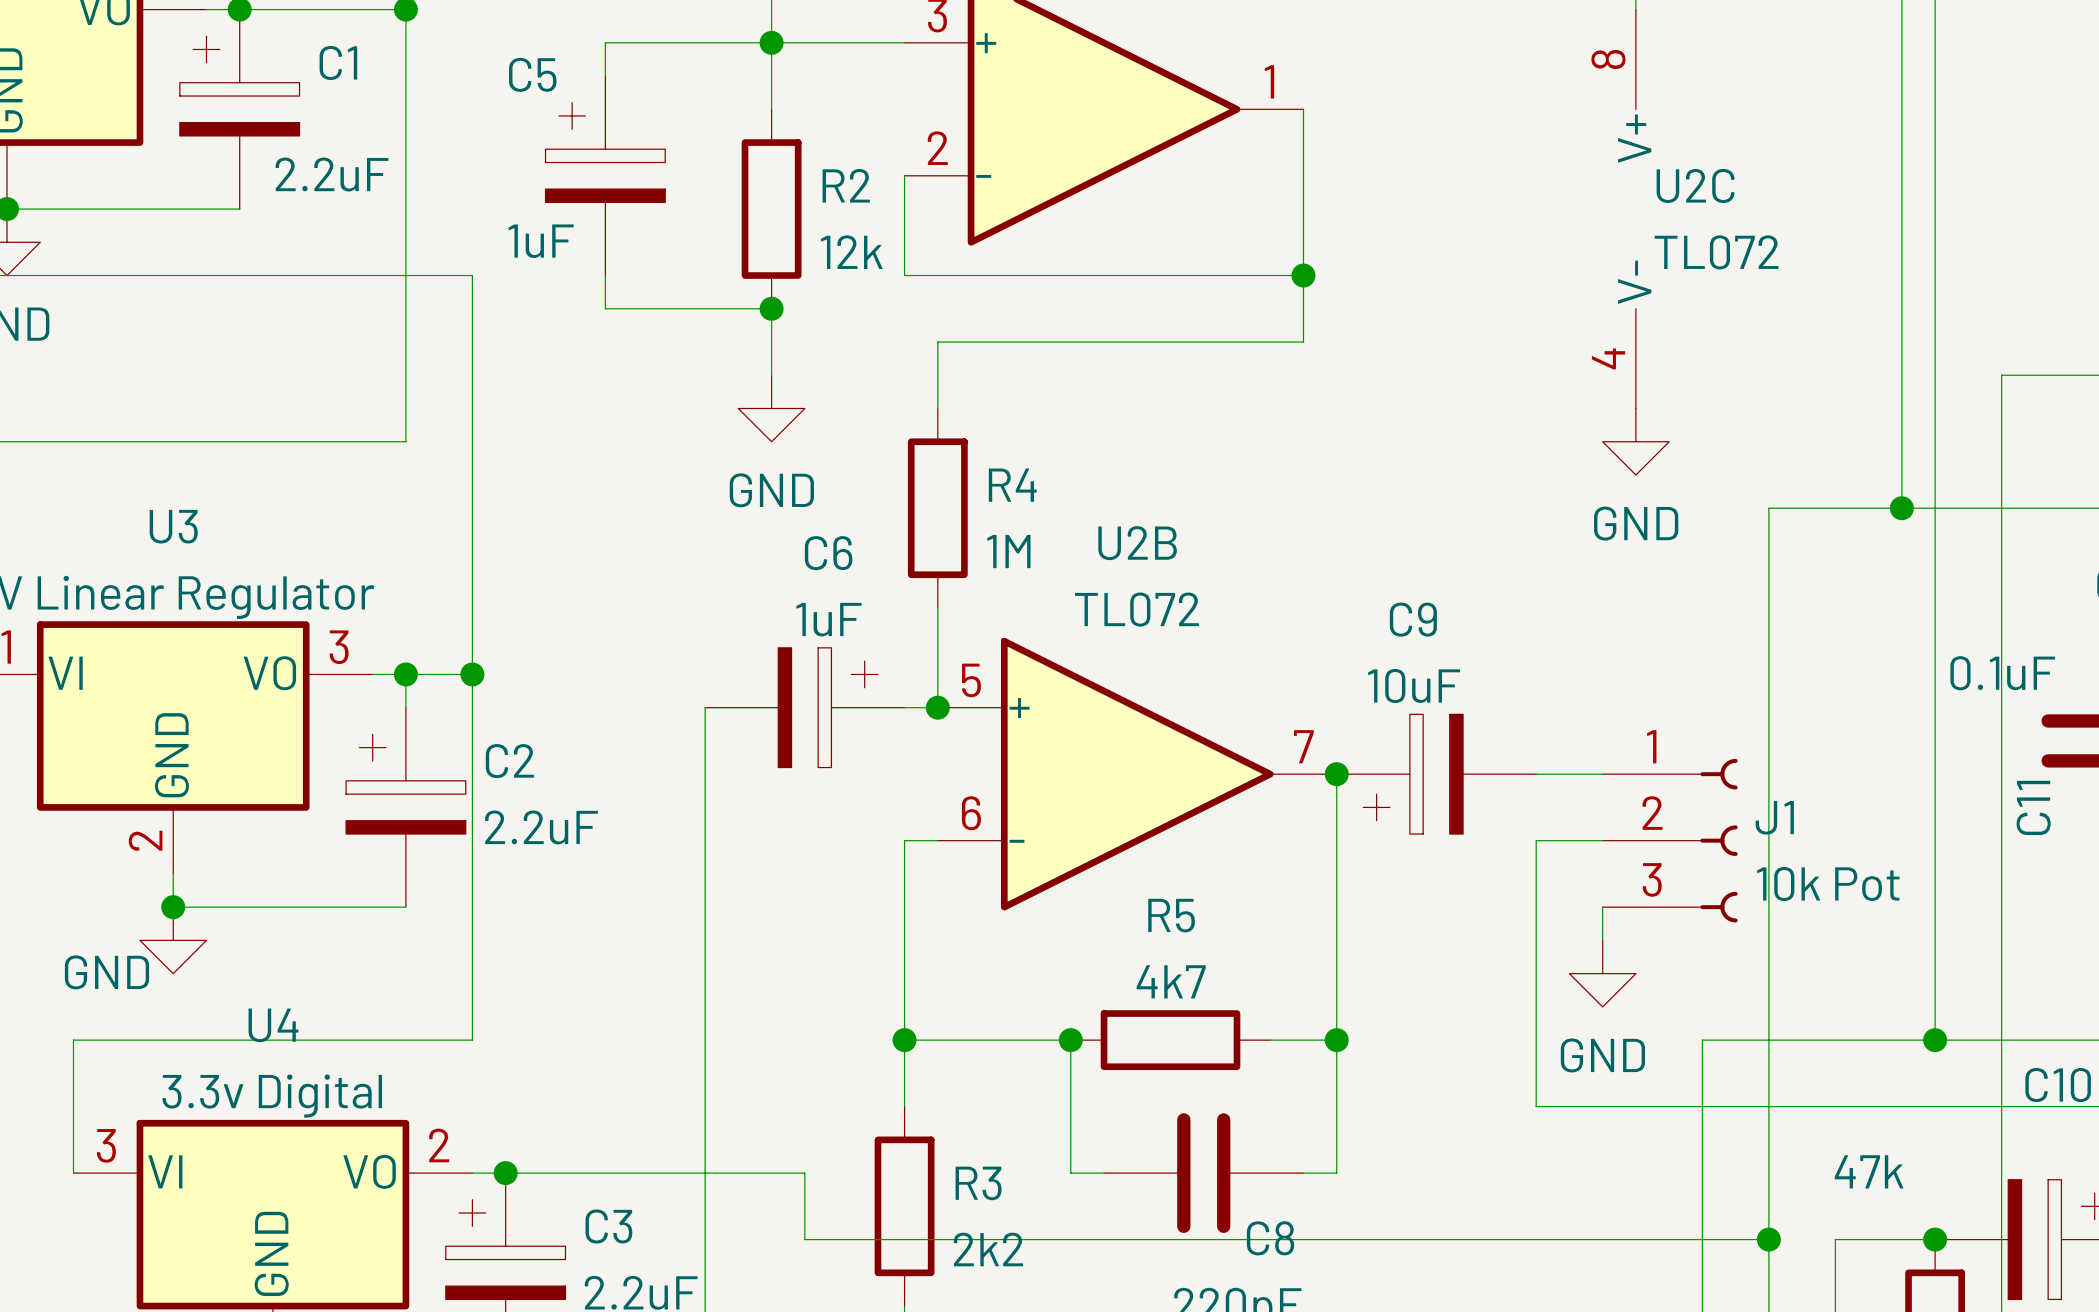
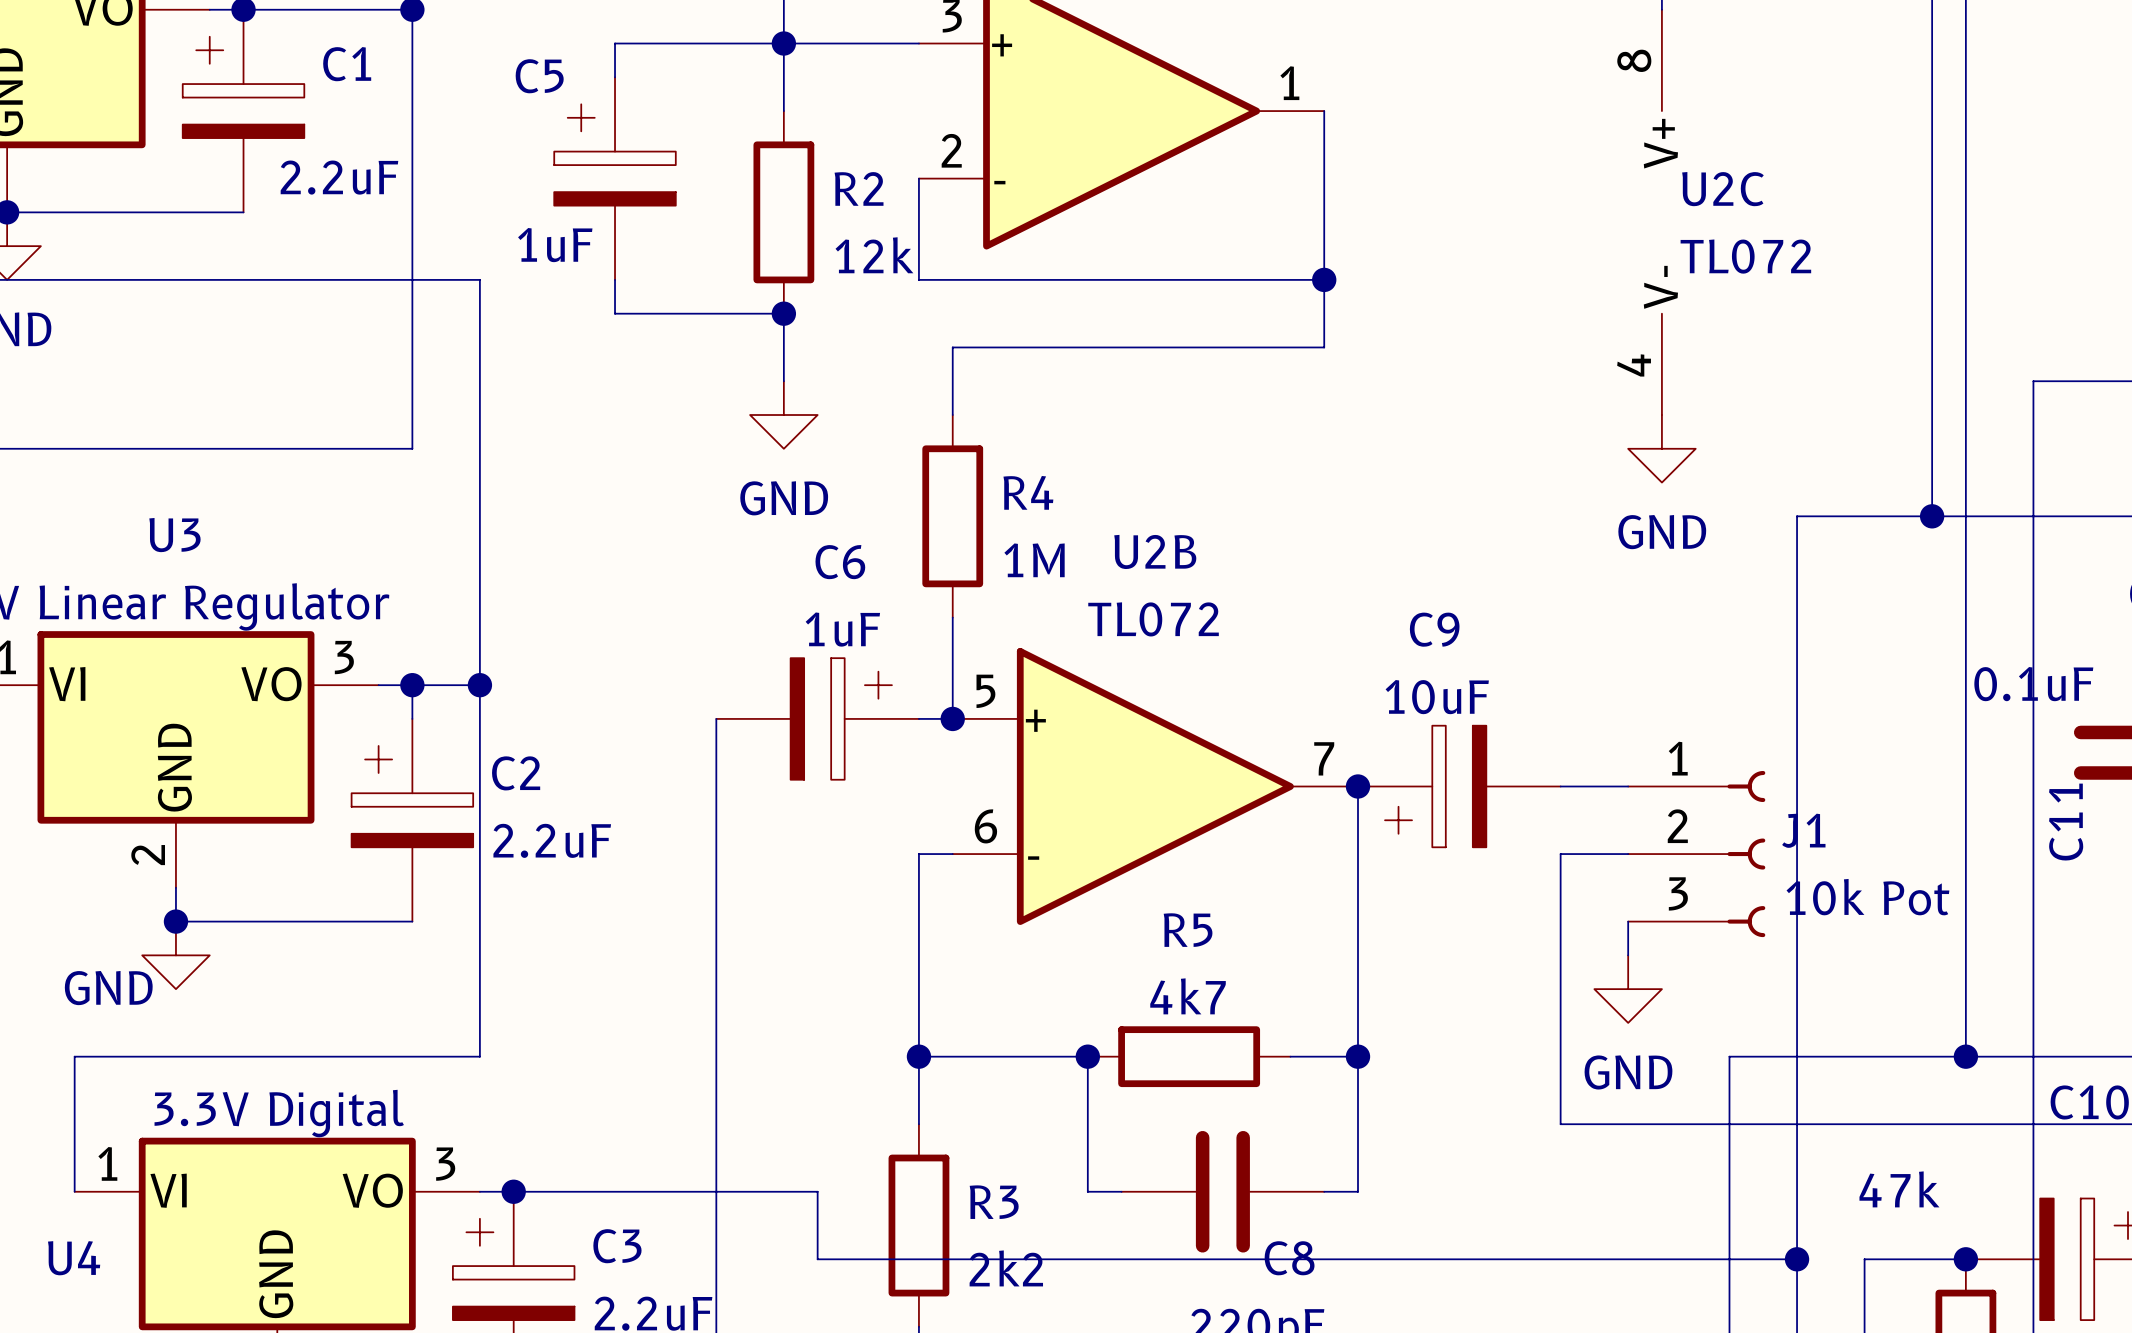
U4 name position: U4 (273, 1025) -> U4 (74, 1258)
U4 value: 3.3v Digital (272, 1096) -> 3.3V Digital (279, 1113)
U4 pin number: 3 (106, 1145) -> 1 (107, 1163)
U4 pin number: 2 (439, 1145) -> 3 (445, 1164)

